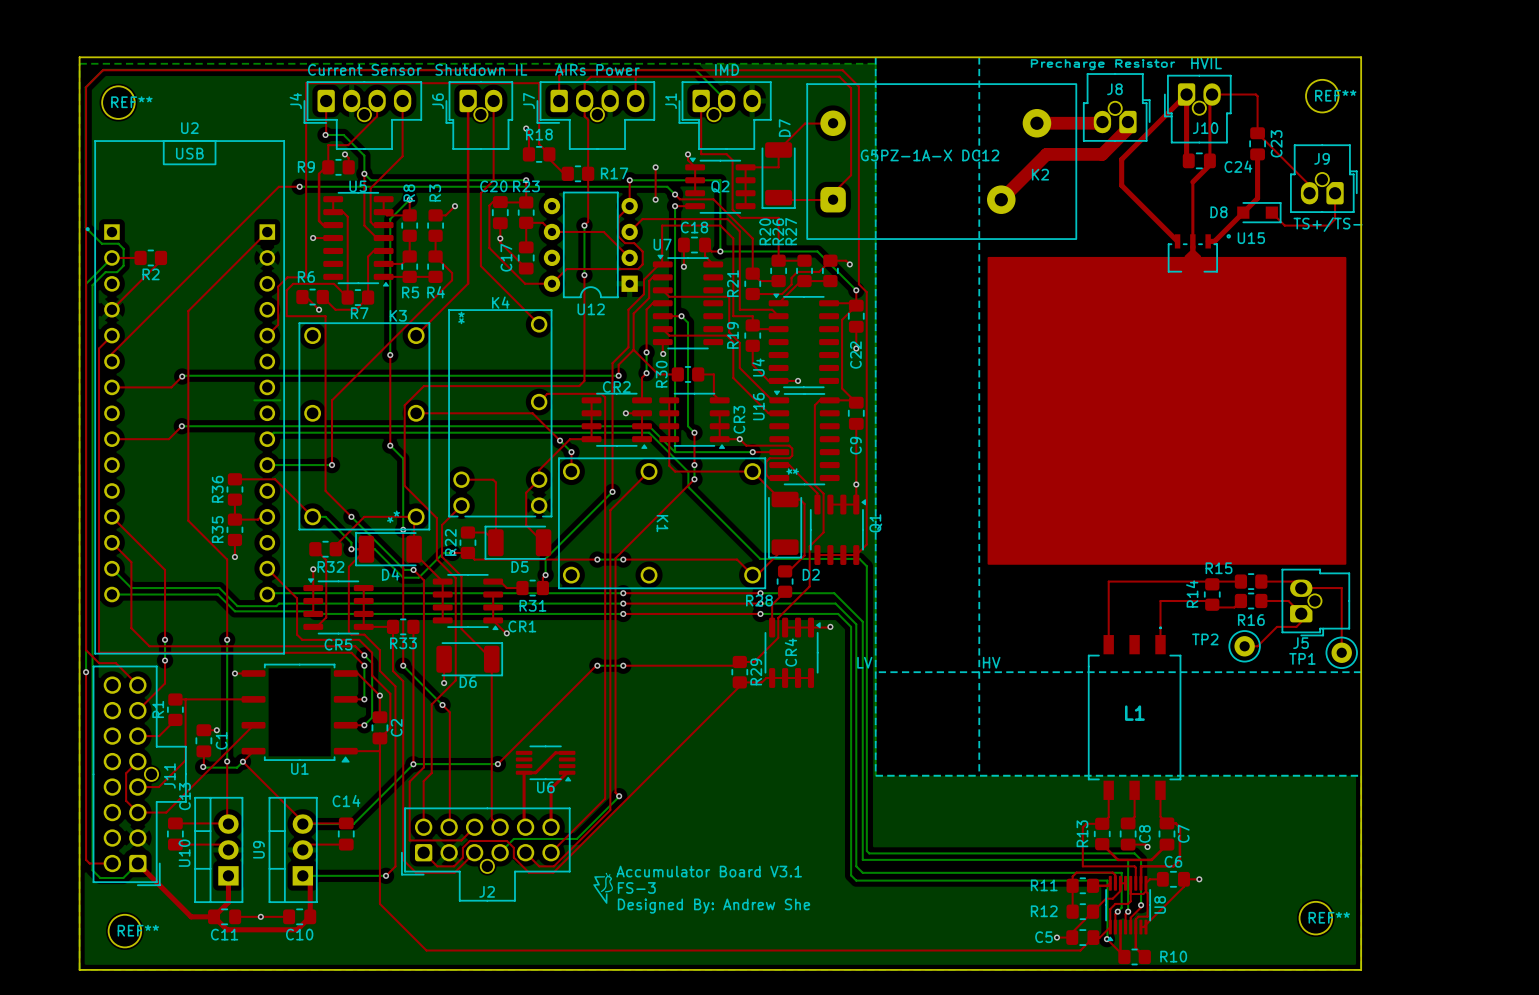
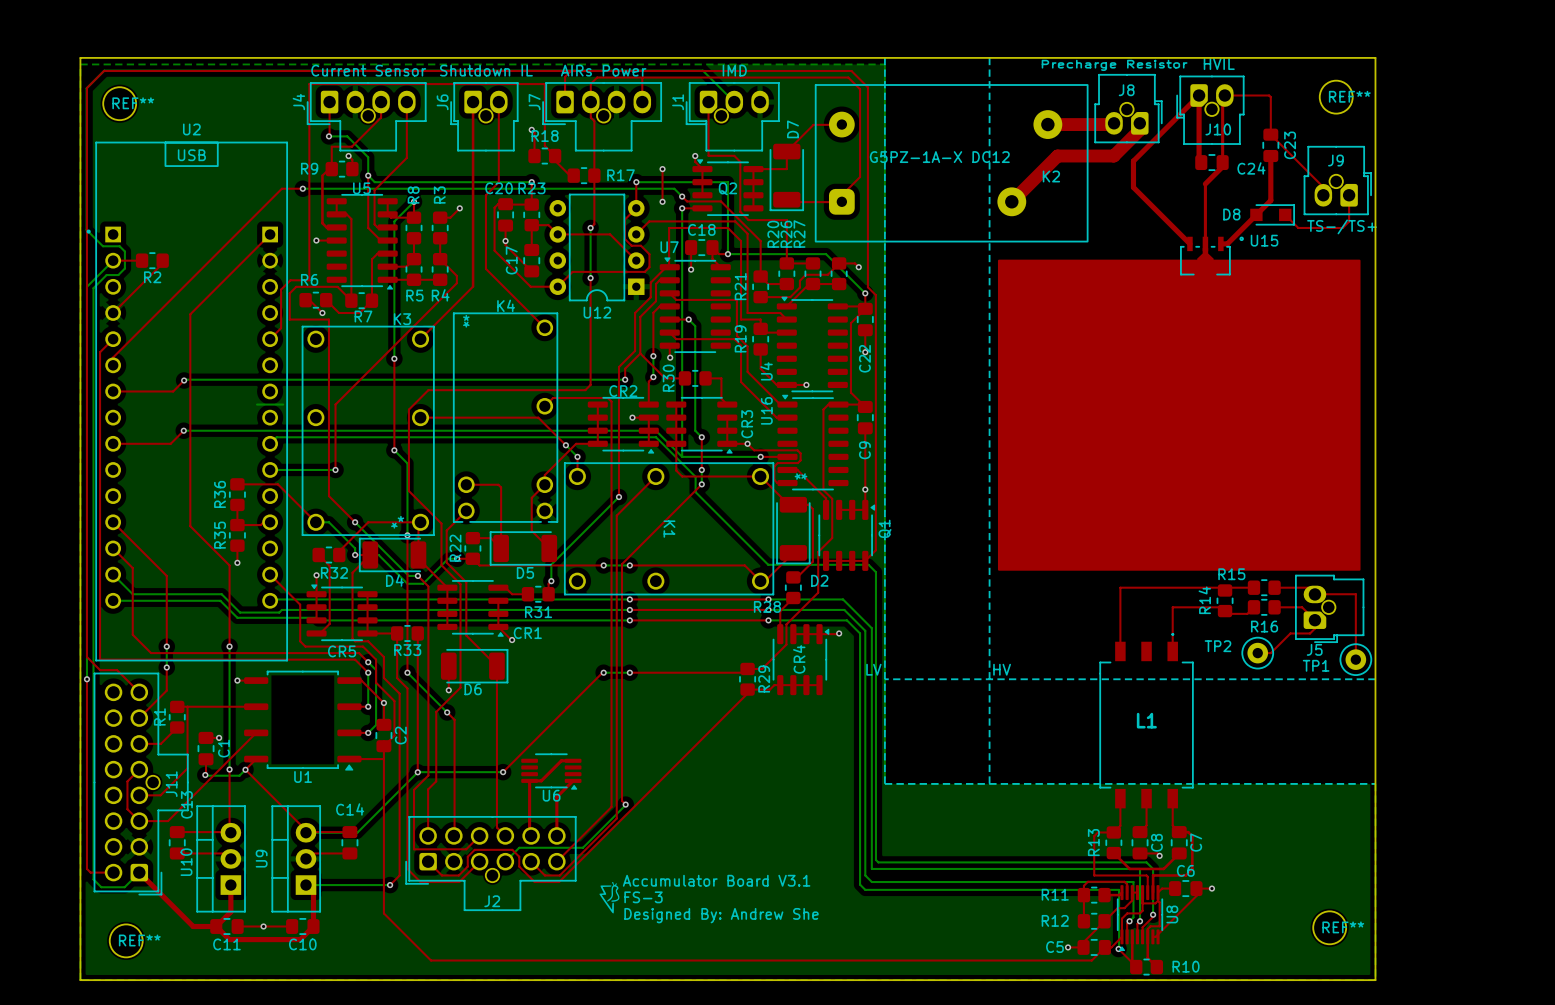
J9 value: TS+/TS- (1328, 224) -> TS-/TS+ (1342, 226)

